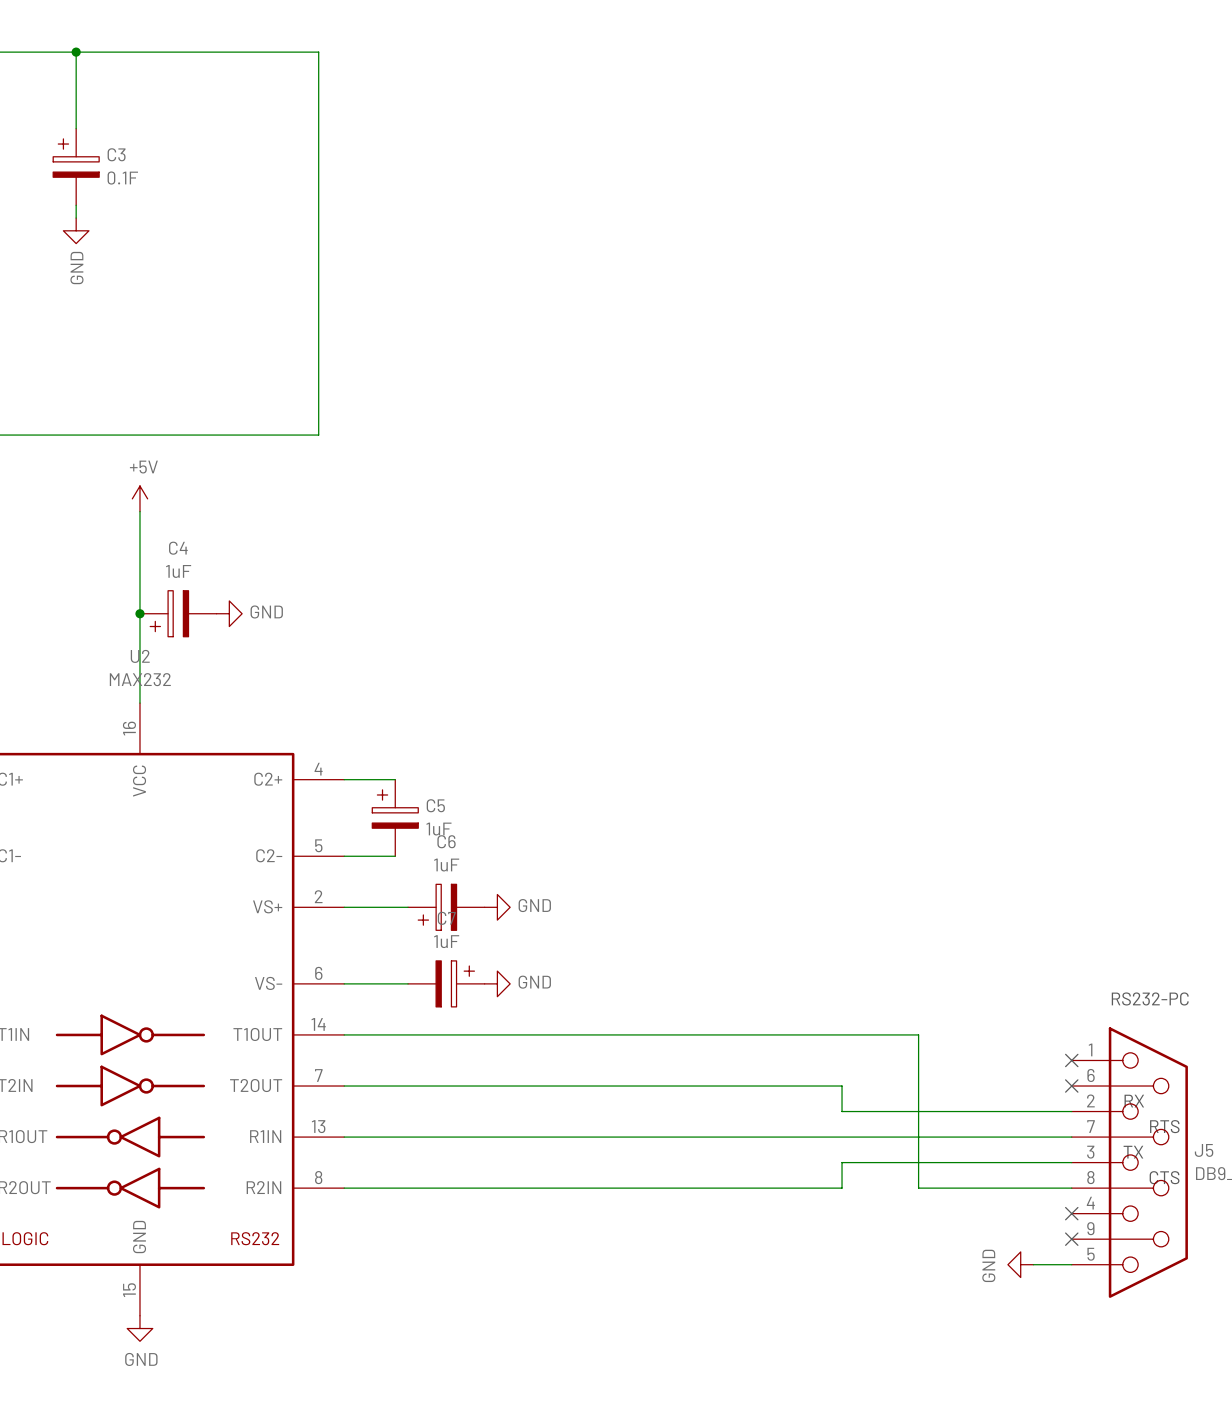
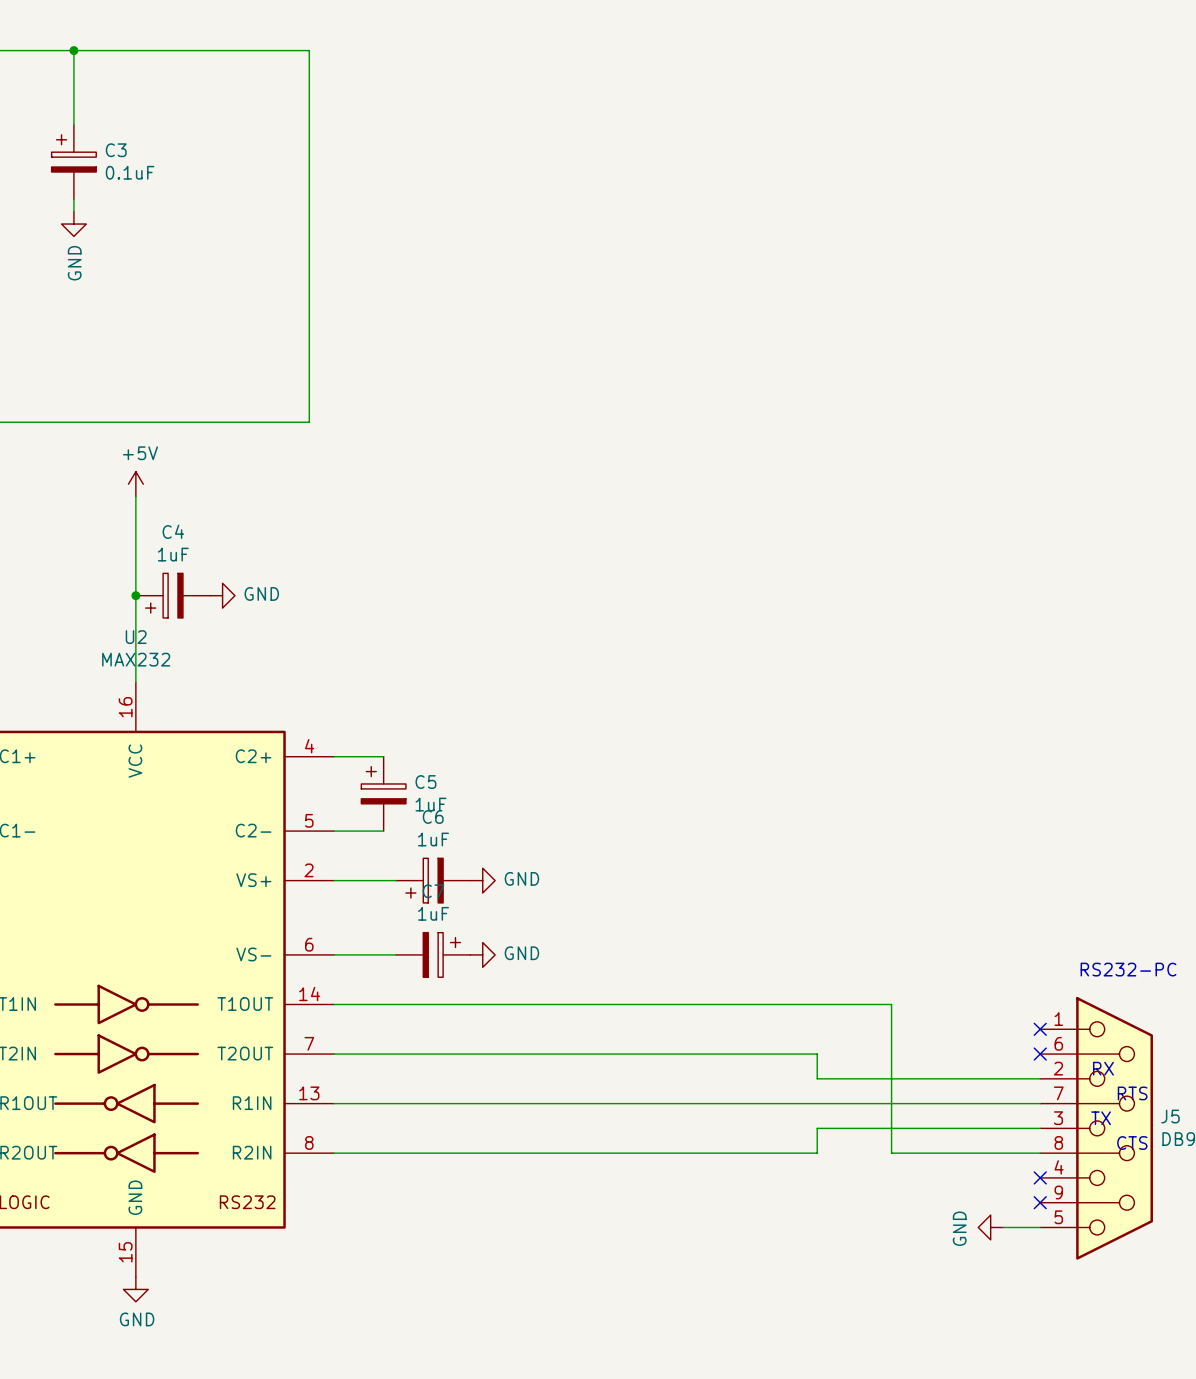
C3 value: 0.1F (122, 178) -> 0.1uF (130, 172)

